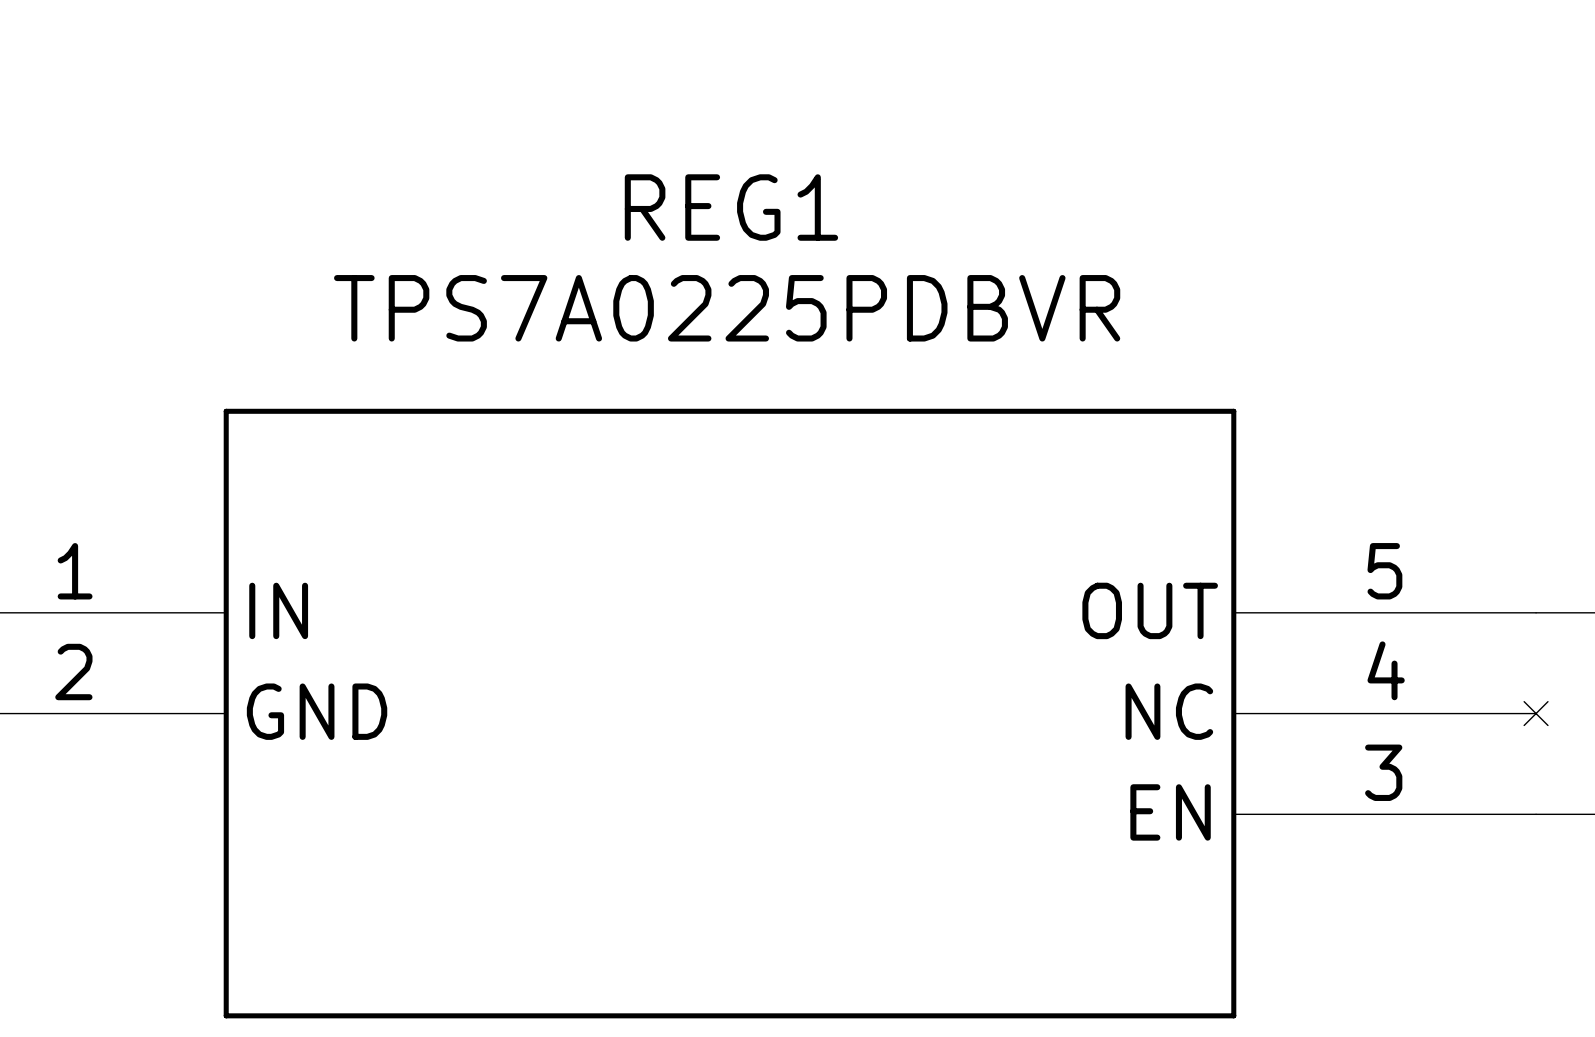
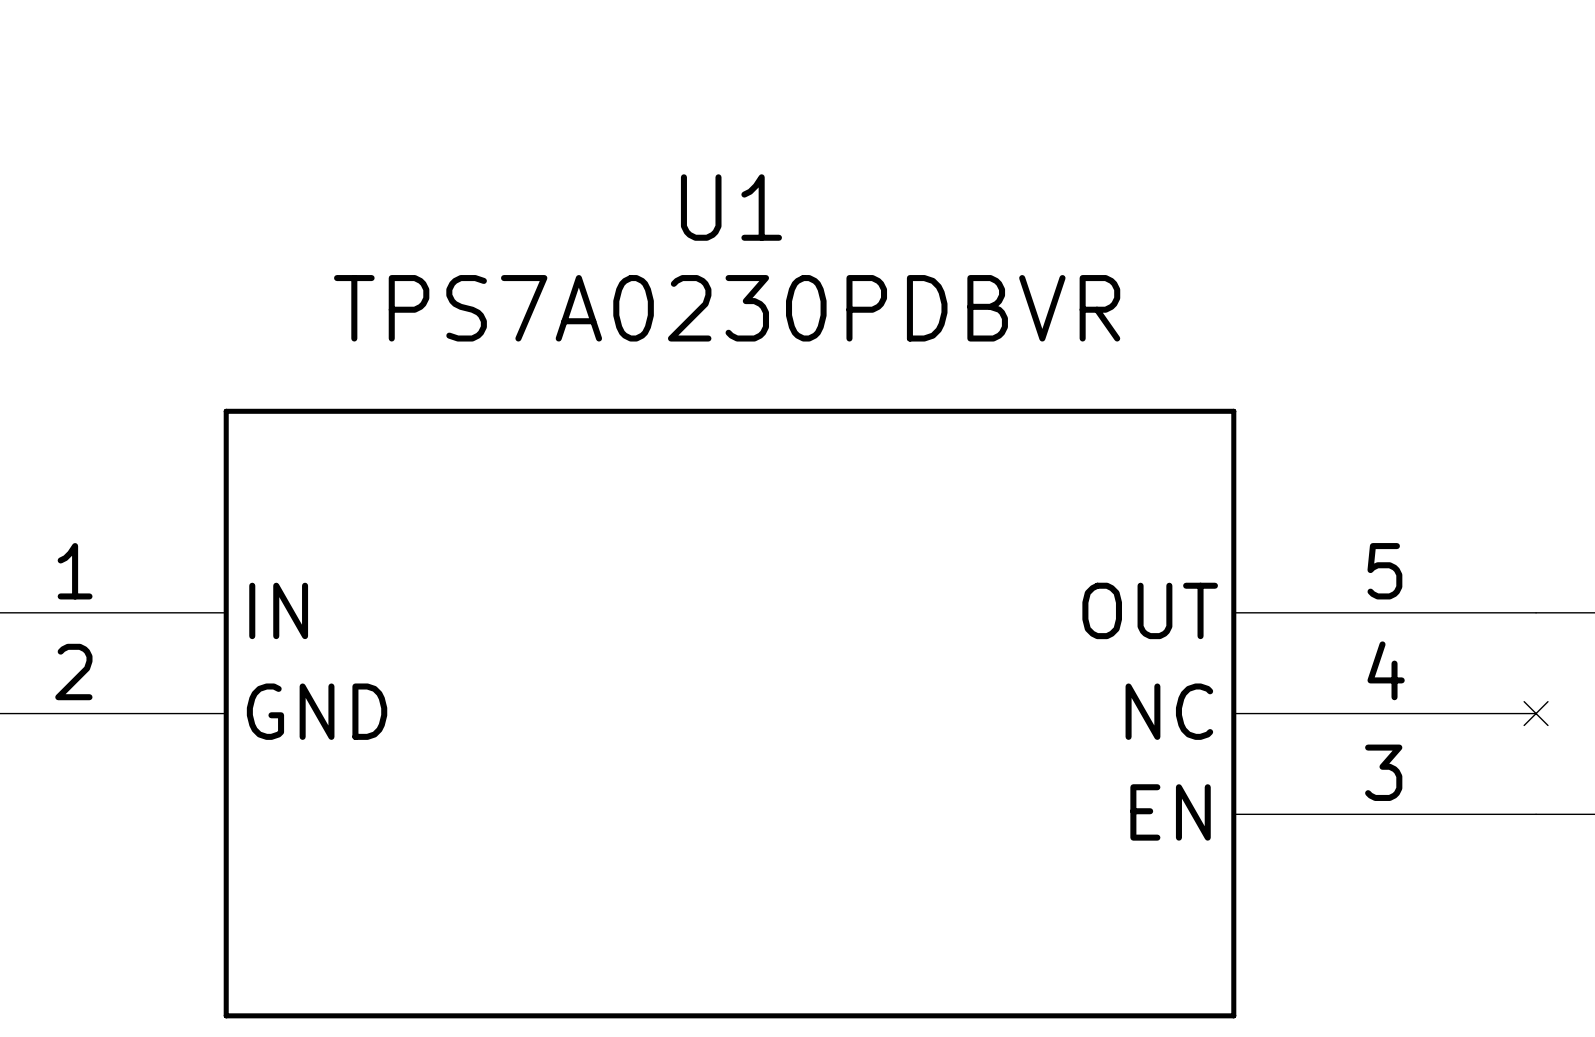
REG1 name: REG1 (731, 207) -> U1 (731, 207)
REG1 value: TPS7A0225PDBVR (727, 308) -> TPS7A0230PDBVR (727, 308)

